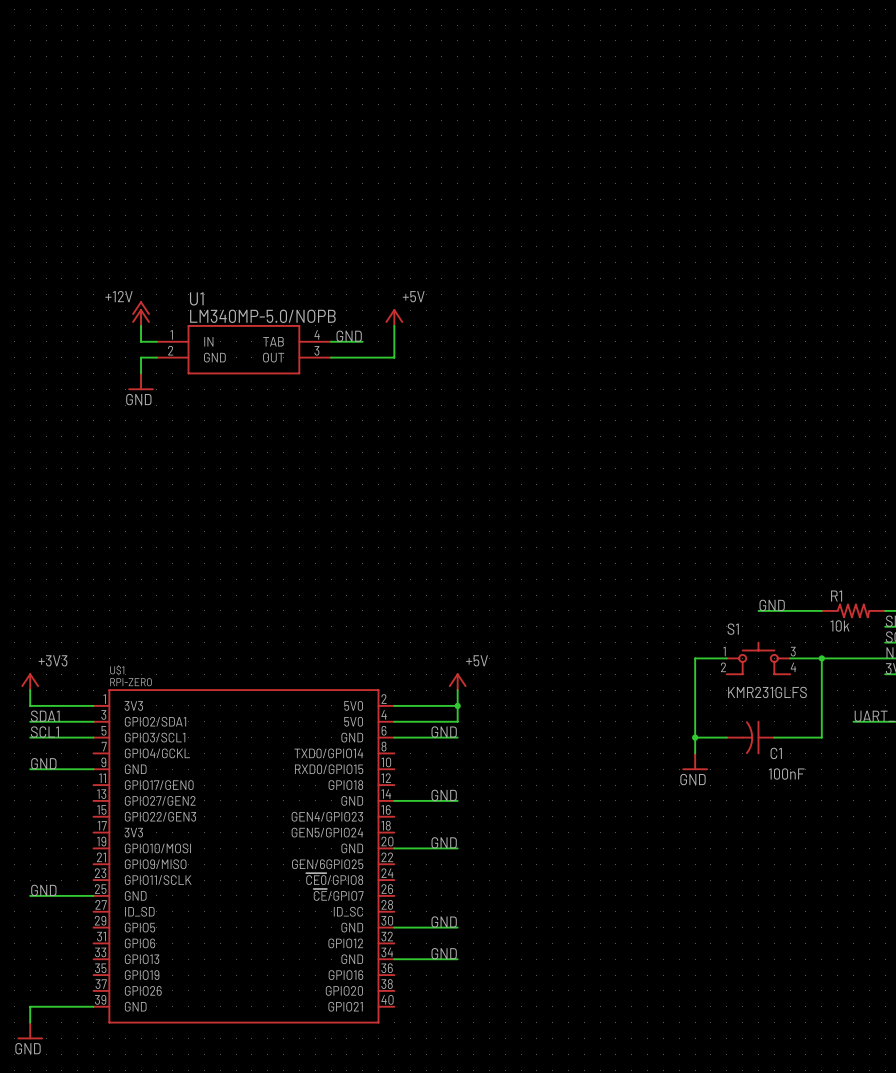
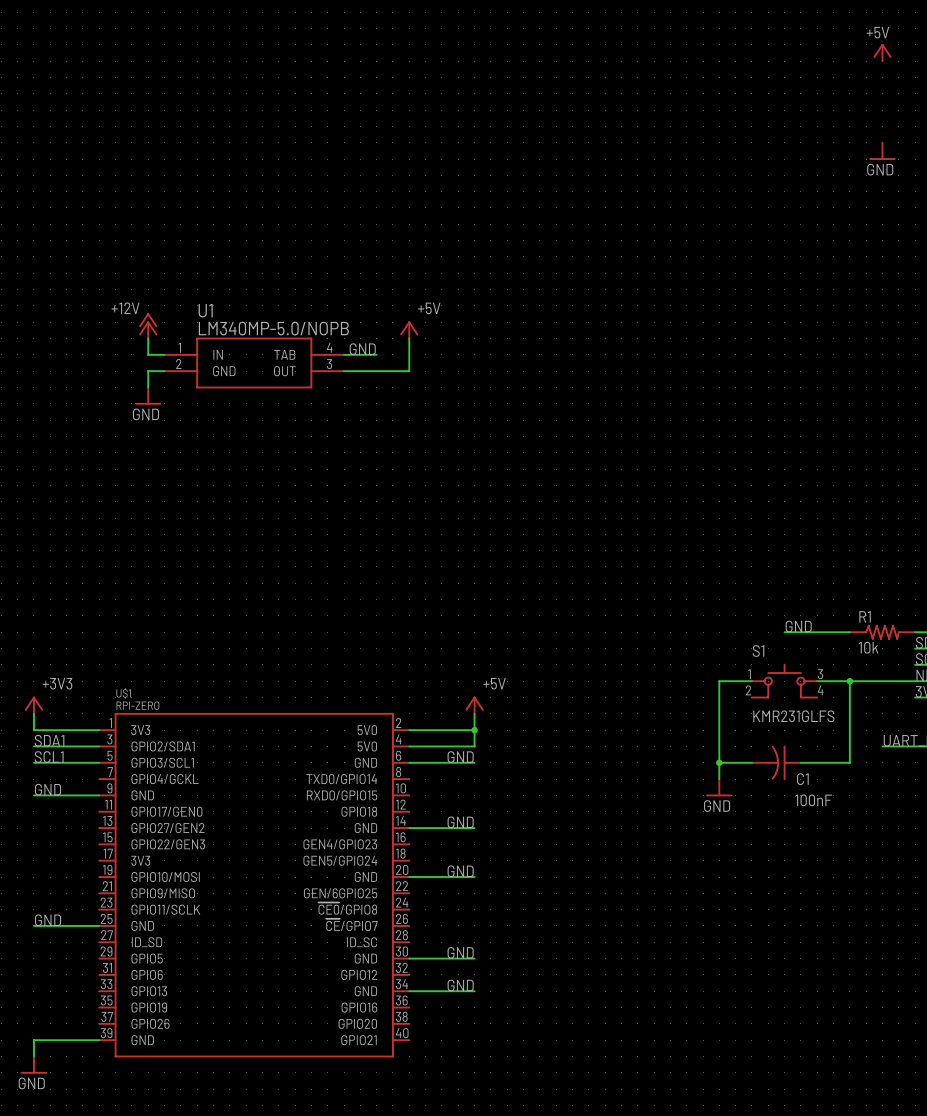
power symbol: none -> +5V (882, 52)
power symbol: none -> GND (882, 151)

